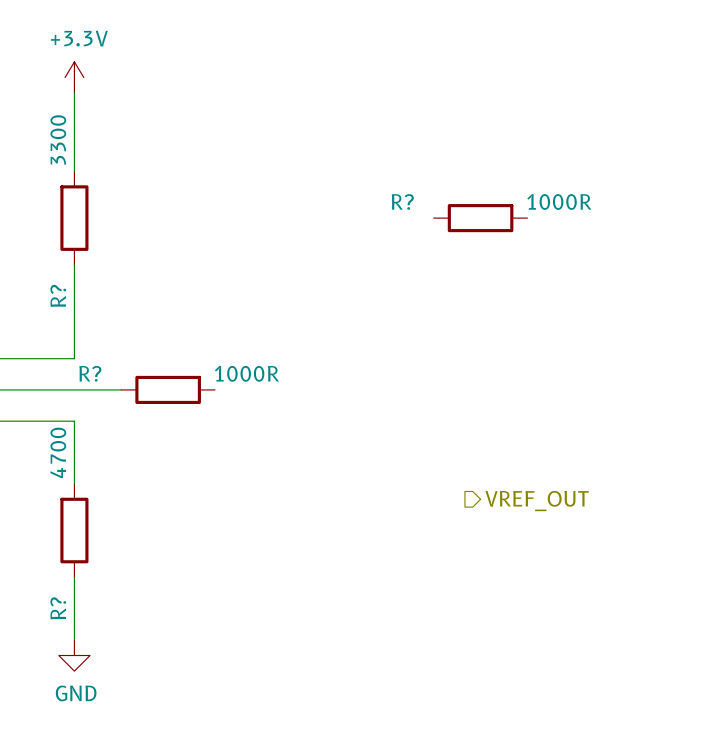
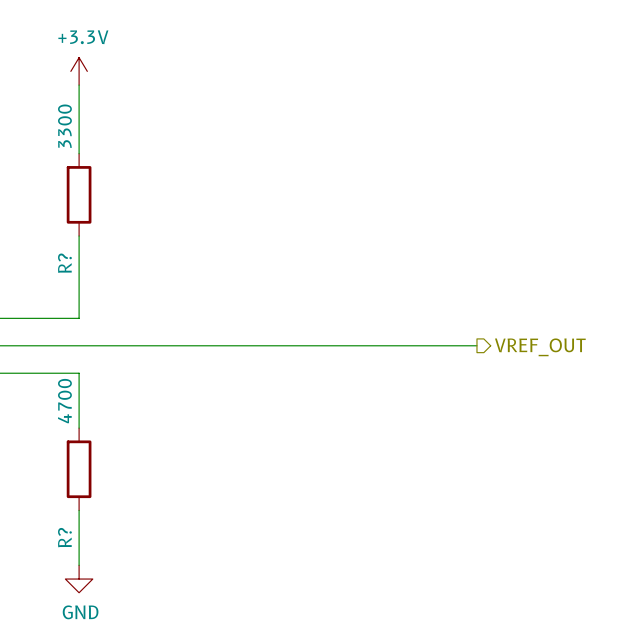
R?: 1000R (480, 218) -> none
wire: none -> (120, 345) (476, 345)
R?: 1000R (168, 389) -> none
hierarchical label position: VREF_OUT (537, 501) -> VREF_OUT (540, 347)

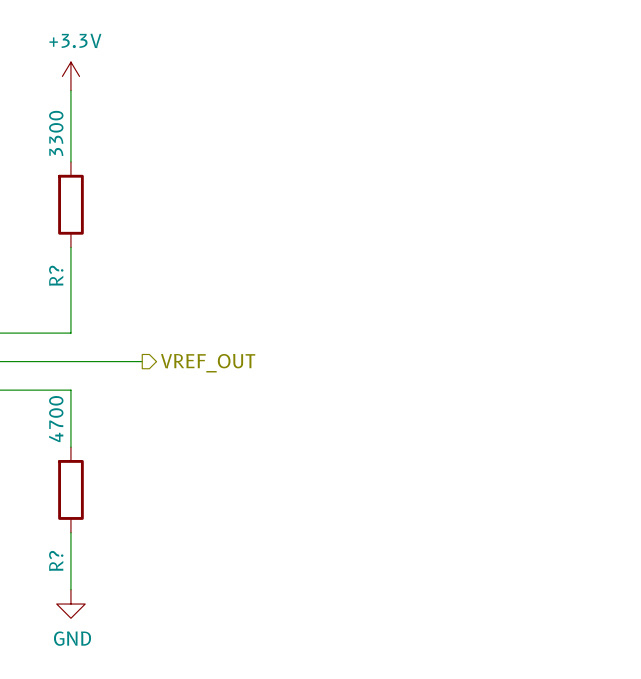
wire: (147, 345) (476, 345) -> none
hierarchical label: none -> VREF_OUT (208, 363)
hierarchical label: VREF_OUT (540, 347) -> none

